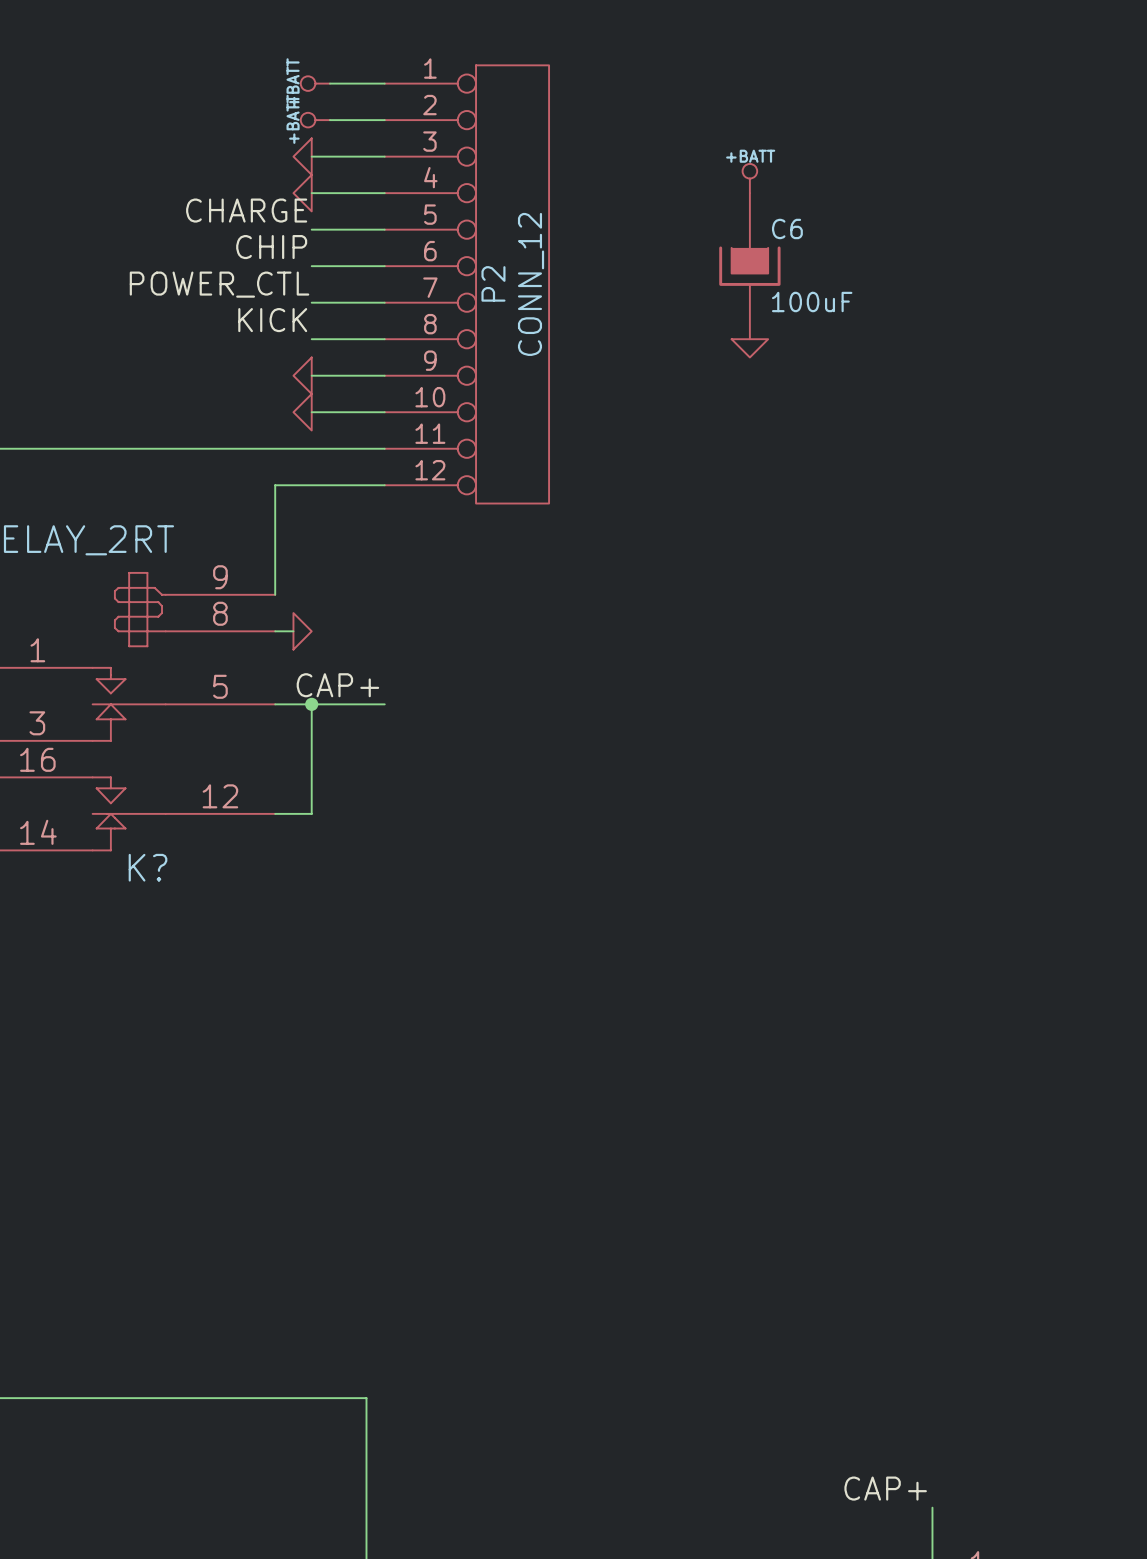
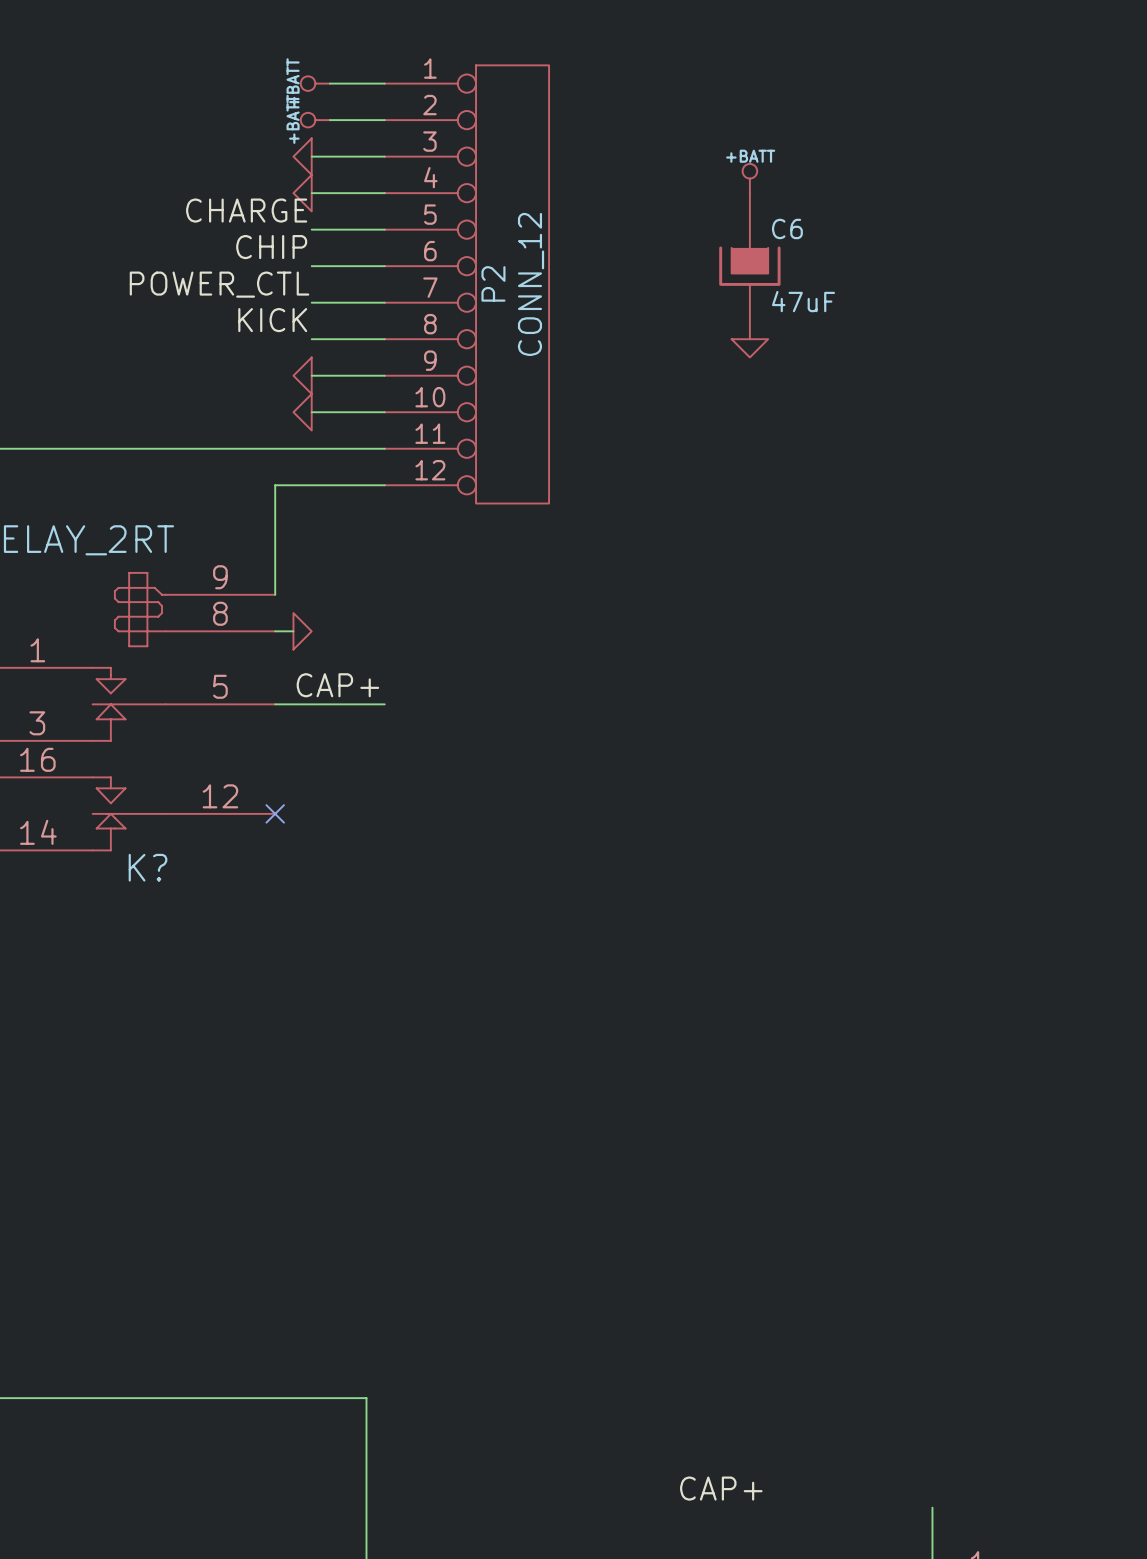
C6 value: 100uF (812, 302) -> 47uF (803, 301)
wire: (311, 704) (311, 813) (275, 813) -> none
junction: (311, 704) -> none
no-connect mark: none -> (275, 813)
label position: CAP+ (885, 1488) -> CAP+ (721, 1488)

